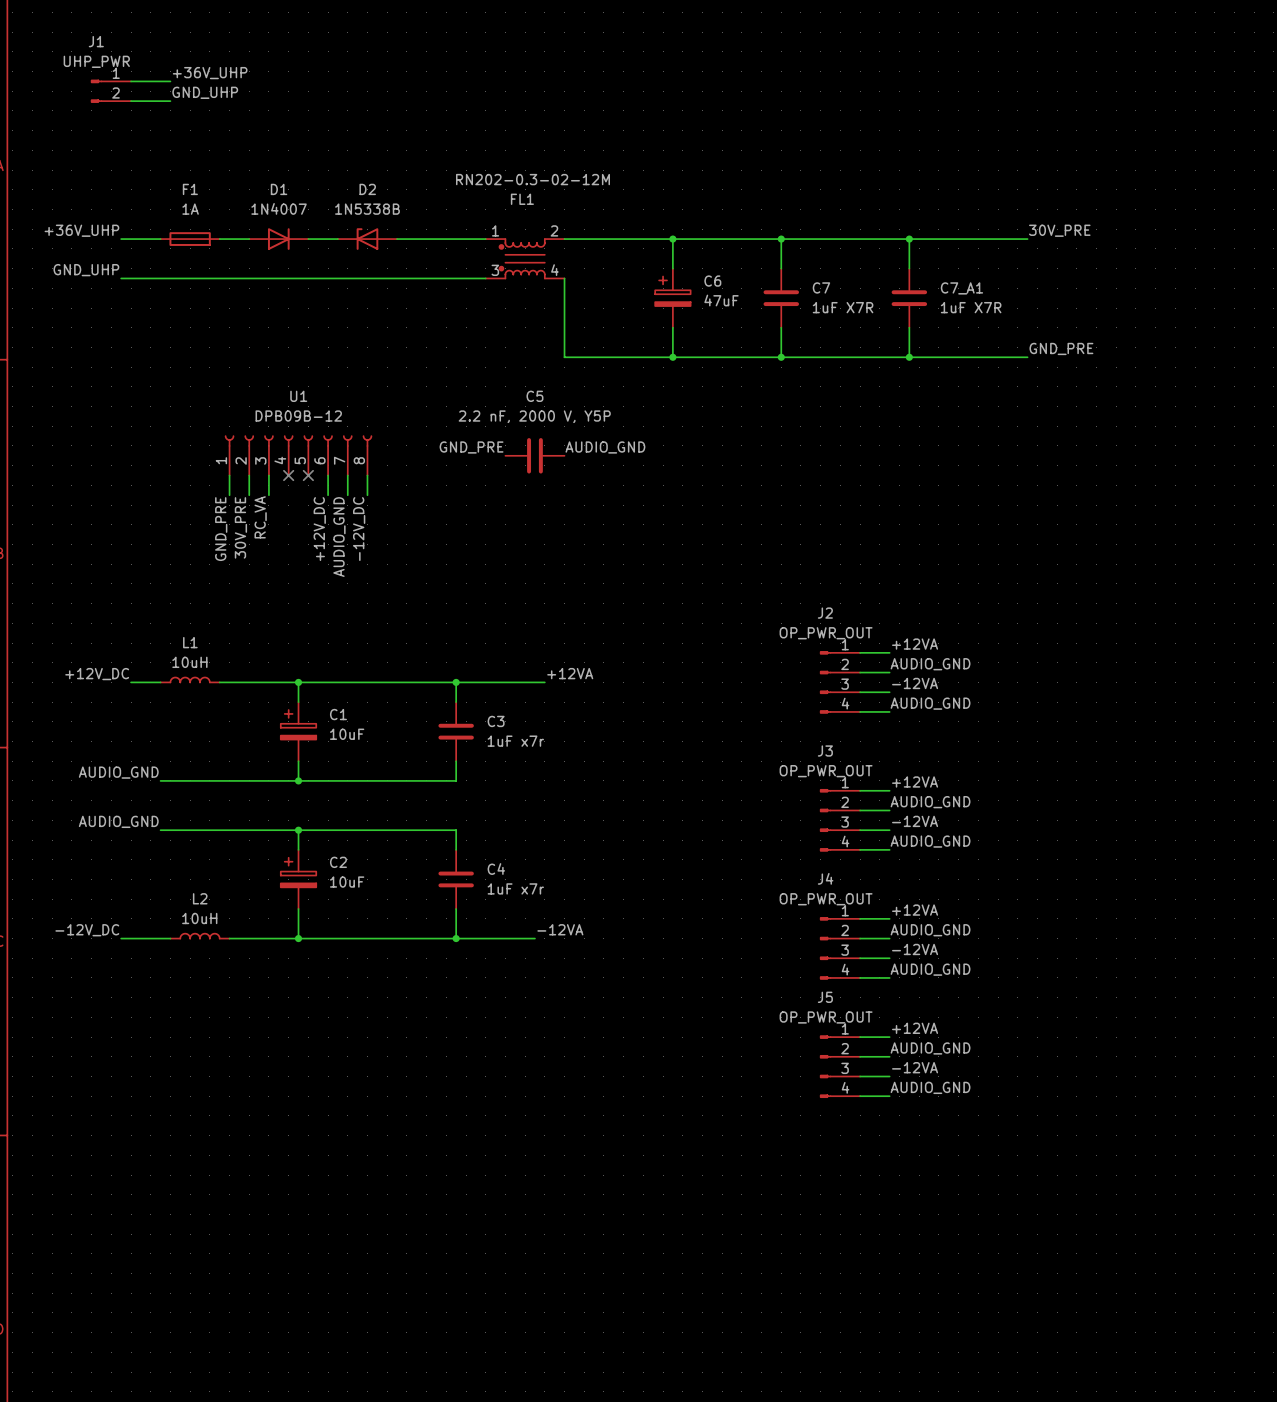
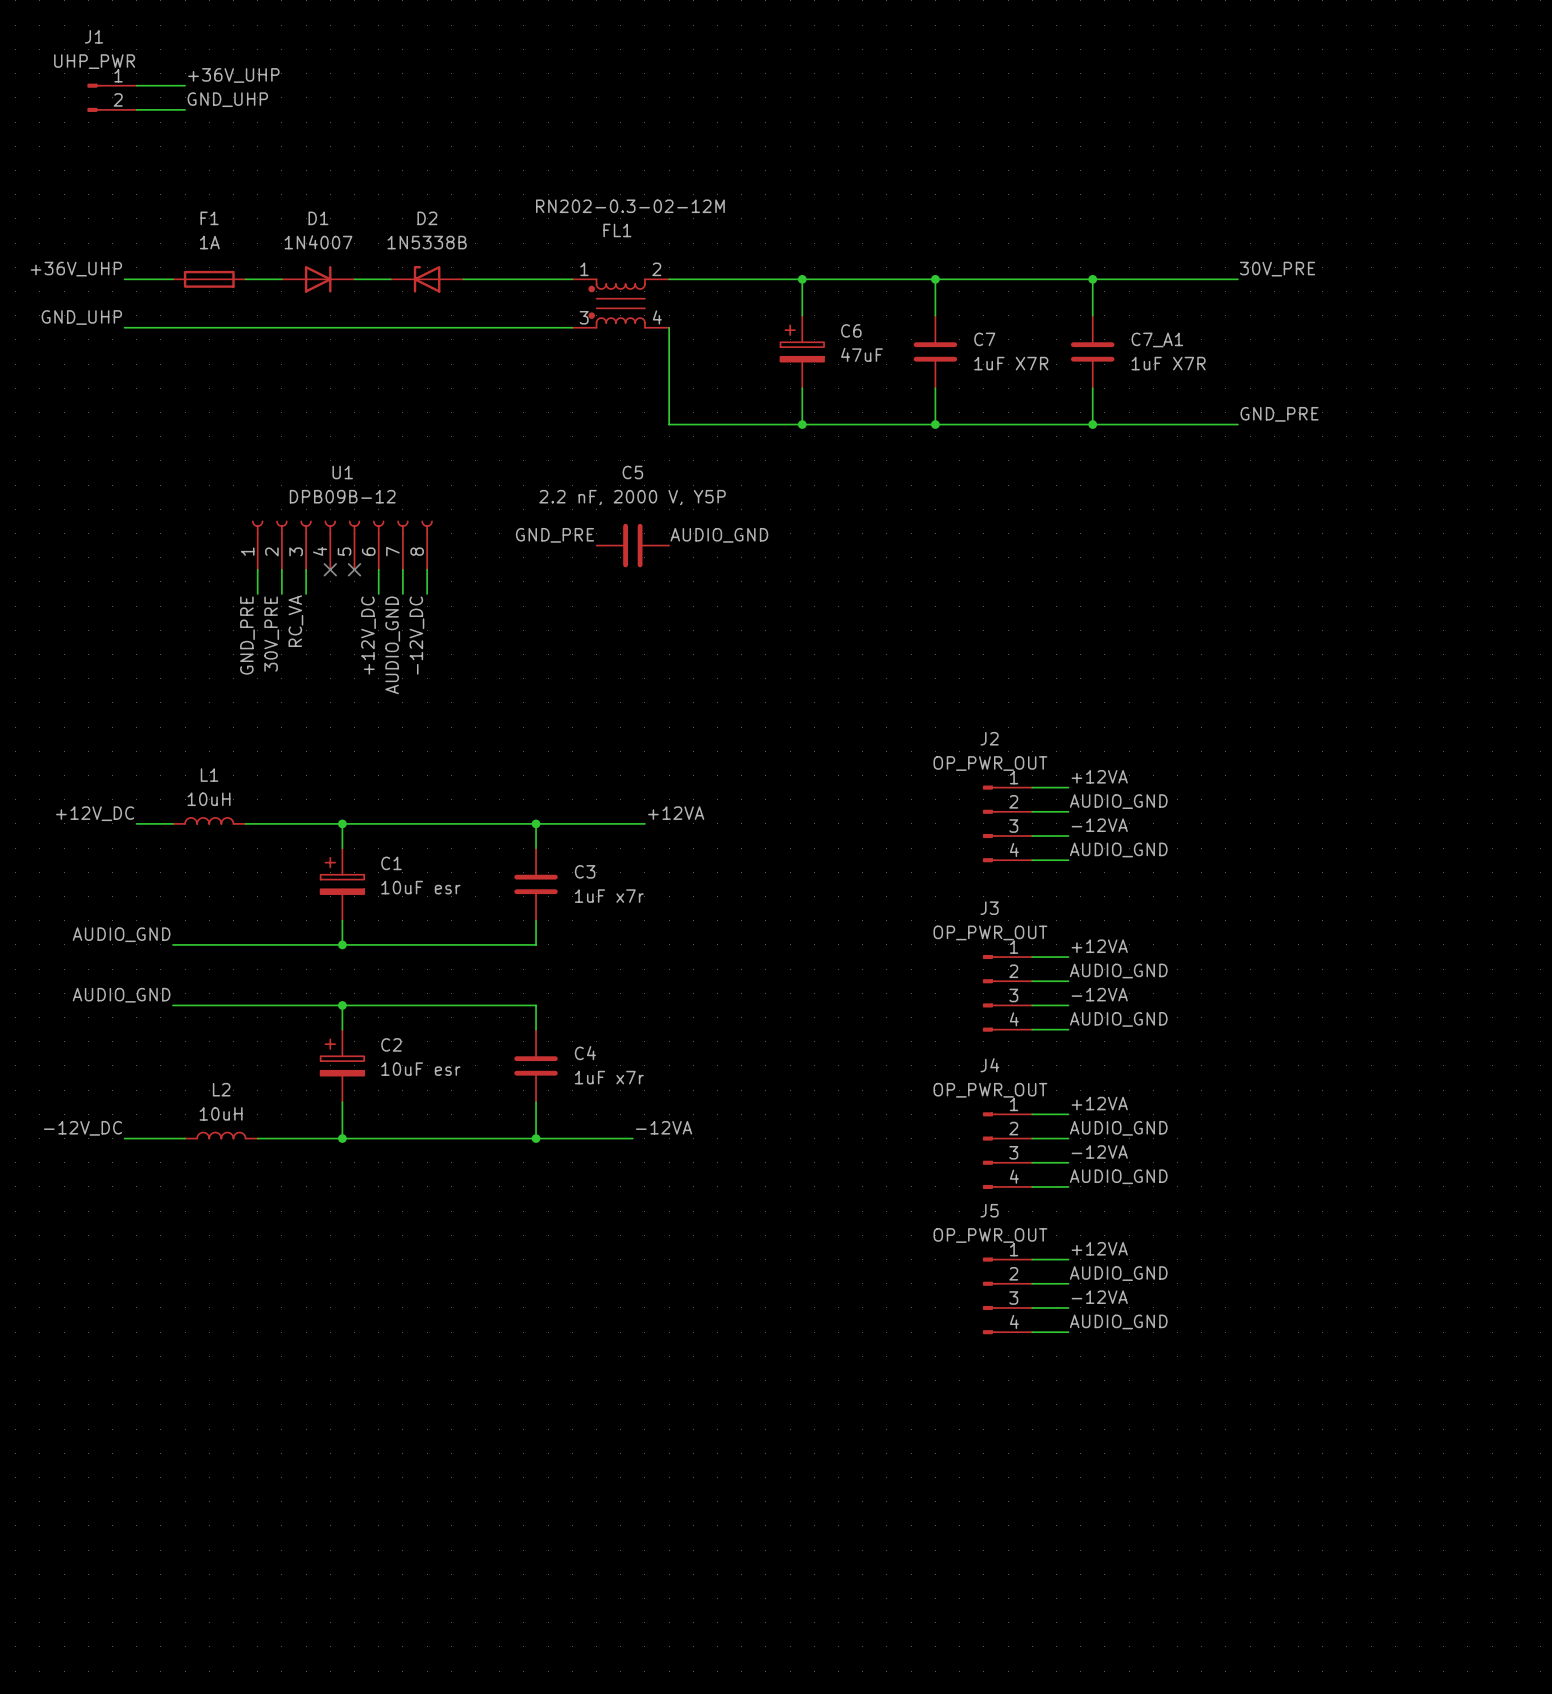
C1 value: 10uF (347, 734) -> 10uF esr (420, 887)
C2 value: 10uF (347, 882) -> 10uF esr (420, 1069)

